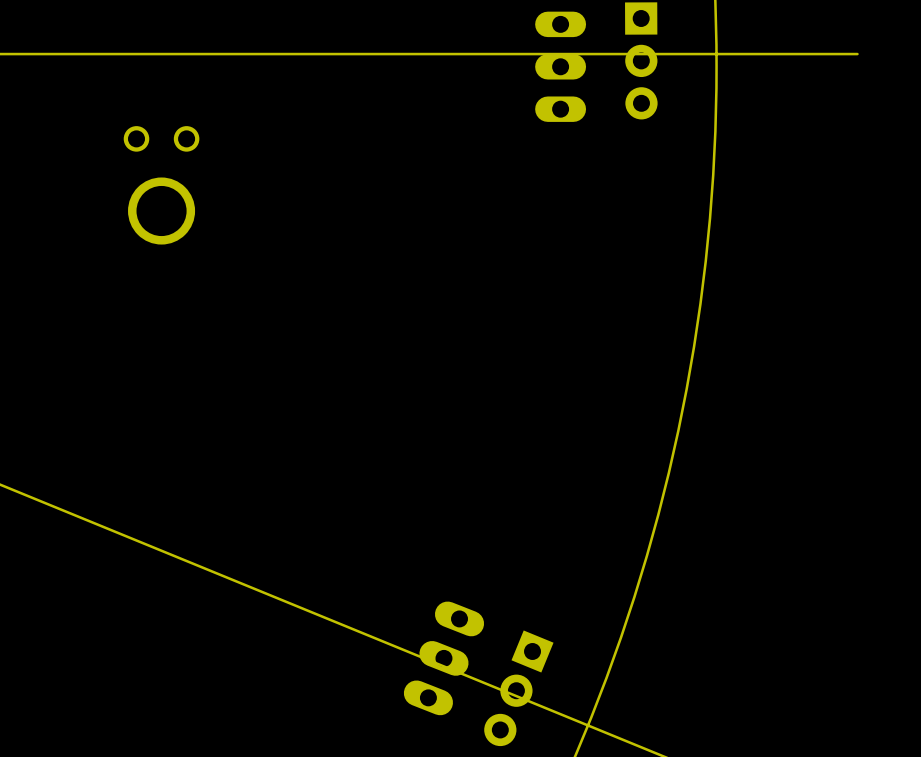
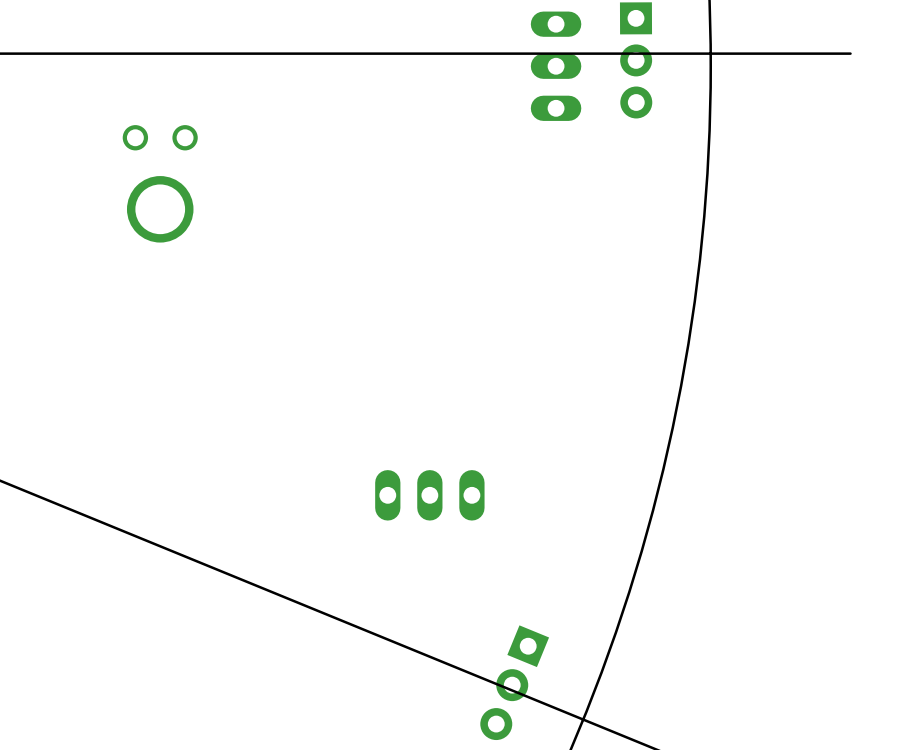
part: none -> (429, 495)
part: (443, 658) -> none

